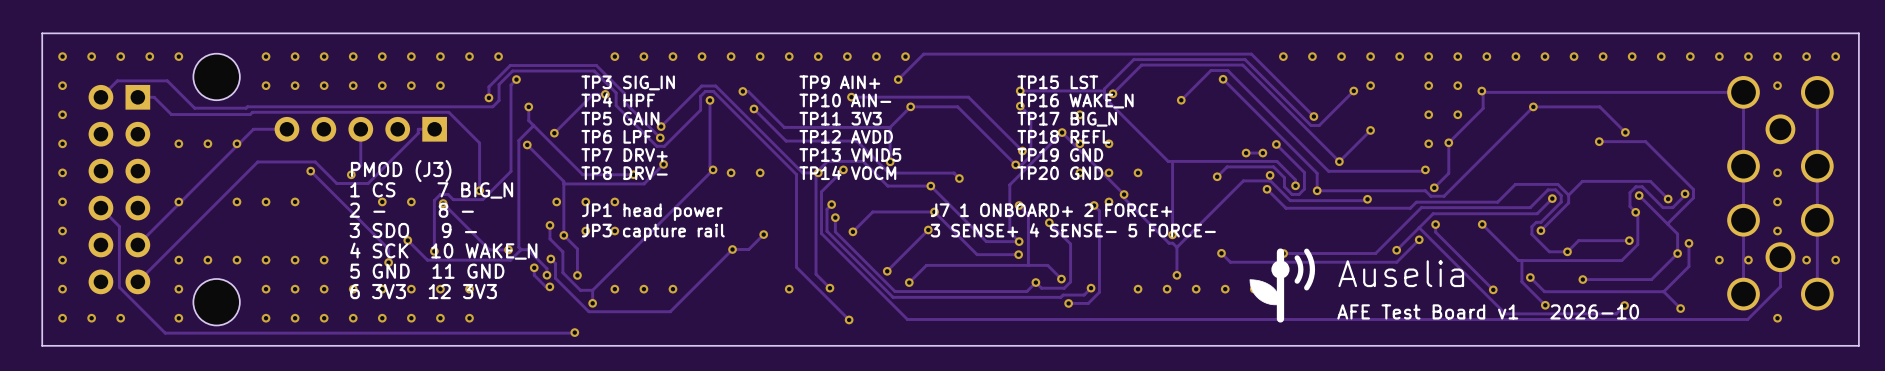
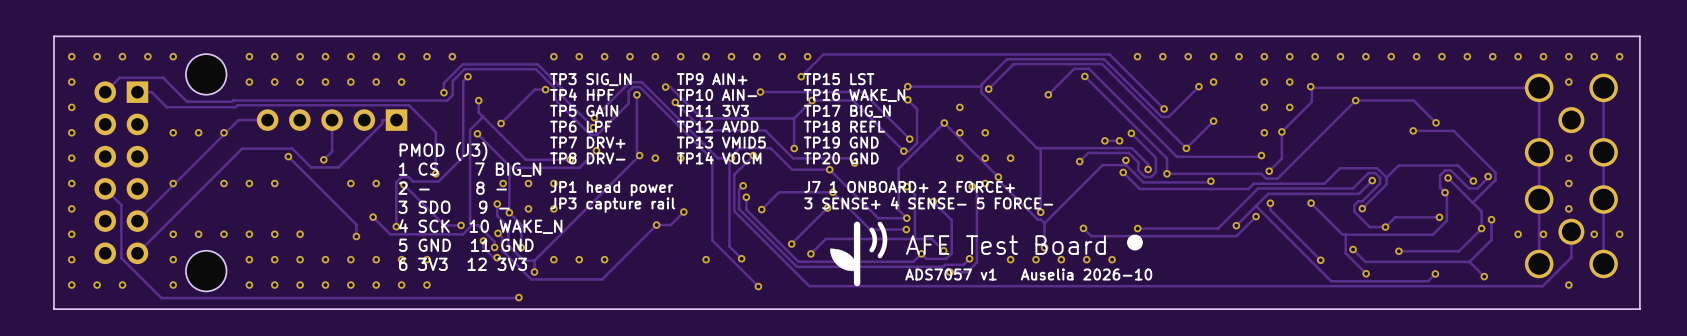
text position: TP3 SIG_IN (628, 82) -> TP3 SIG_IN (590, 79)
text position: TP9 AIN+ (839, 82) -> TP9 AIN+ (712, 79)
text position: TP15 LST (1057, 82) -> TP15 LST (839, 79)
text position: TP4 HPF (618, 100) -> TP4 HPF (582, 94)
text position: TP10 AIN- (845, 100) -> TP10 AIN- (717, 94)
text position: TP16 WAKE_N (1075, 101) -> TP16 WAKE_N (854, 95)
text position: TP5 GAIN (620, 118) -> TP5 GAIN (584, 110)
text position: TP11 3V3 (840, 118) -> TP11 3V3 (712, 110)
text position: TP17 BIG_N (1067, 119) -> TP17 BIG_N (847, 111)
text position: TP6 LPF (616, 136) -> TP6 LPF (580, 126)
text position: TP12 AVDD (846, 136) -> TP12 AVDD (717, 126)
text position: TP18 REFL (1063, 136) -> TP18 REFL (844, 126)
text position: TP7 DRV+ (624, 155) -> TP7 DRV+ (587, 142)
text position: TP13 VMID5 (850, 155) -> TP13 VMID5 (721, 142)
text position: TP19 GND (1060, 155) -> TP19 GND (841, 142)
text position: PMOD (J3) (401, 171) -> PMOD (J3) (443, 151)
text position: TP14 VOCM (847, 172) -> TP14 VOCM (719, 158)
text position: TP8 DRV- (624, 173) -> TP8 DRV- (587, 158)
text position: TP20 GND (1060, 173) -> TP20 GND (841, 158)
text position: 1 CS 7 BIG_N (431, 190) -> 1 CS 7 BIG_N (470, 169)
text position: 2 - 8 - (411, 210) -> 2 - 8 - (452, 188)
text position: J7 1 ONBOARD+ 2 FORCE+ (1051, 210) -> J7 1 ONBOARD+ 2 FORCE+ (909, 186)
text position: JP1 head power (652, 212) -> JP1 head power (611, 188)
text position: 3 SDO 9 - (413, 230) -> 3 SDO 9 - (454, 207)
text position: 3 SENSE+ 4 SENSE- 5 FORCE- (1073, 230) -> 3 SENSE+ 4 SENSE- 5 FORCE- (928, 203)
text position: JP3 capture rail (653, 232) -> JP3 capture rail (612, 205)
text position: 4 SCK 10 WAKE_N (443, 251) -> 4 SCK 10 WAKE_N (480, 226)
line: (1306, 251) (1312, 269) (1306, 287) -> (879, 224) (885, 239) (879, 255)
line: (1280, 252) (1280, 318) -> (857, 224) (857, 283)
line: (1297, 257) (1300, 269) (1297, 281) -> (871, 229) (874, 239) (871, 250)
text position: 5 GND 11 GND (427, 271) -> 5 GND 11 GND (466, 245)
text: none -> AFE Test Board (1005, 245)
text: Auselia (1401, 273) -> none
text position: 6 3V3 12 3V3 (423, 291) -> 6 3V3 12 3V3 (463, 264)
drawing position: (1265, 292) -> (843, 259)
text: none -> ADS7057 v1 Auselia 2026-10 (1028, 274)
text: AFE Test Board v1 2026-10 (1488, 311) -> none

